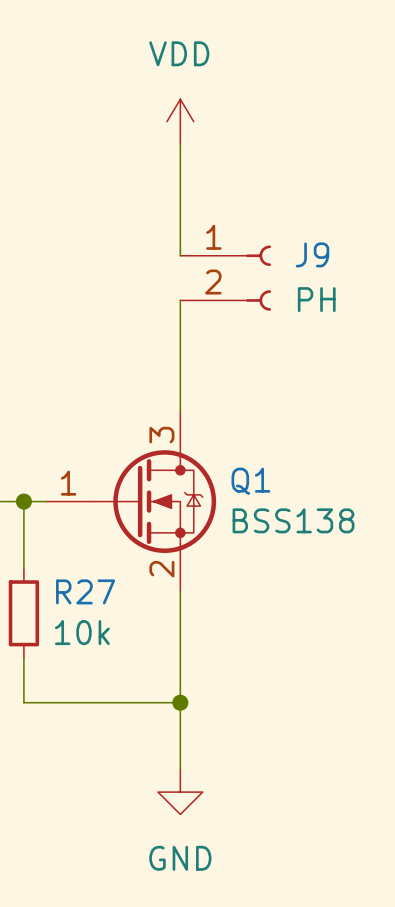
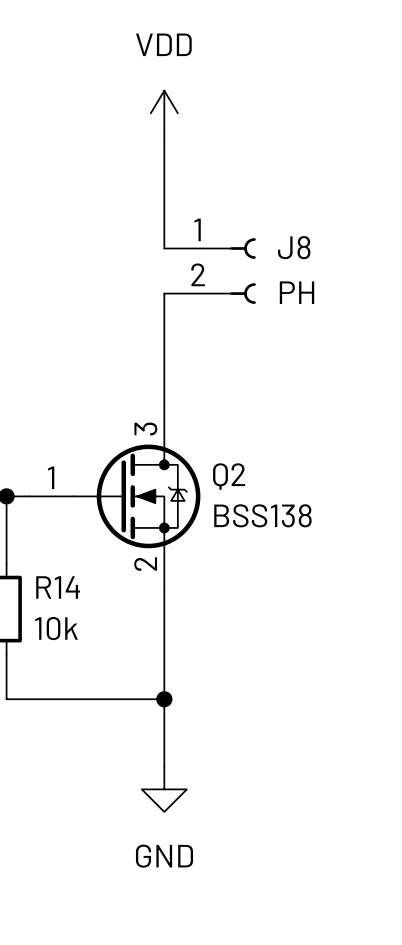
J9 name: J9 (312, 254) -> J8 (294, 247)
Q1 name: Q1 (250, 481) -> Q2 (229, 476)
R27 name: R27 (85, 591) -> R14 (58, 587)

